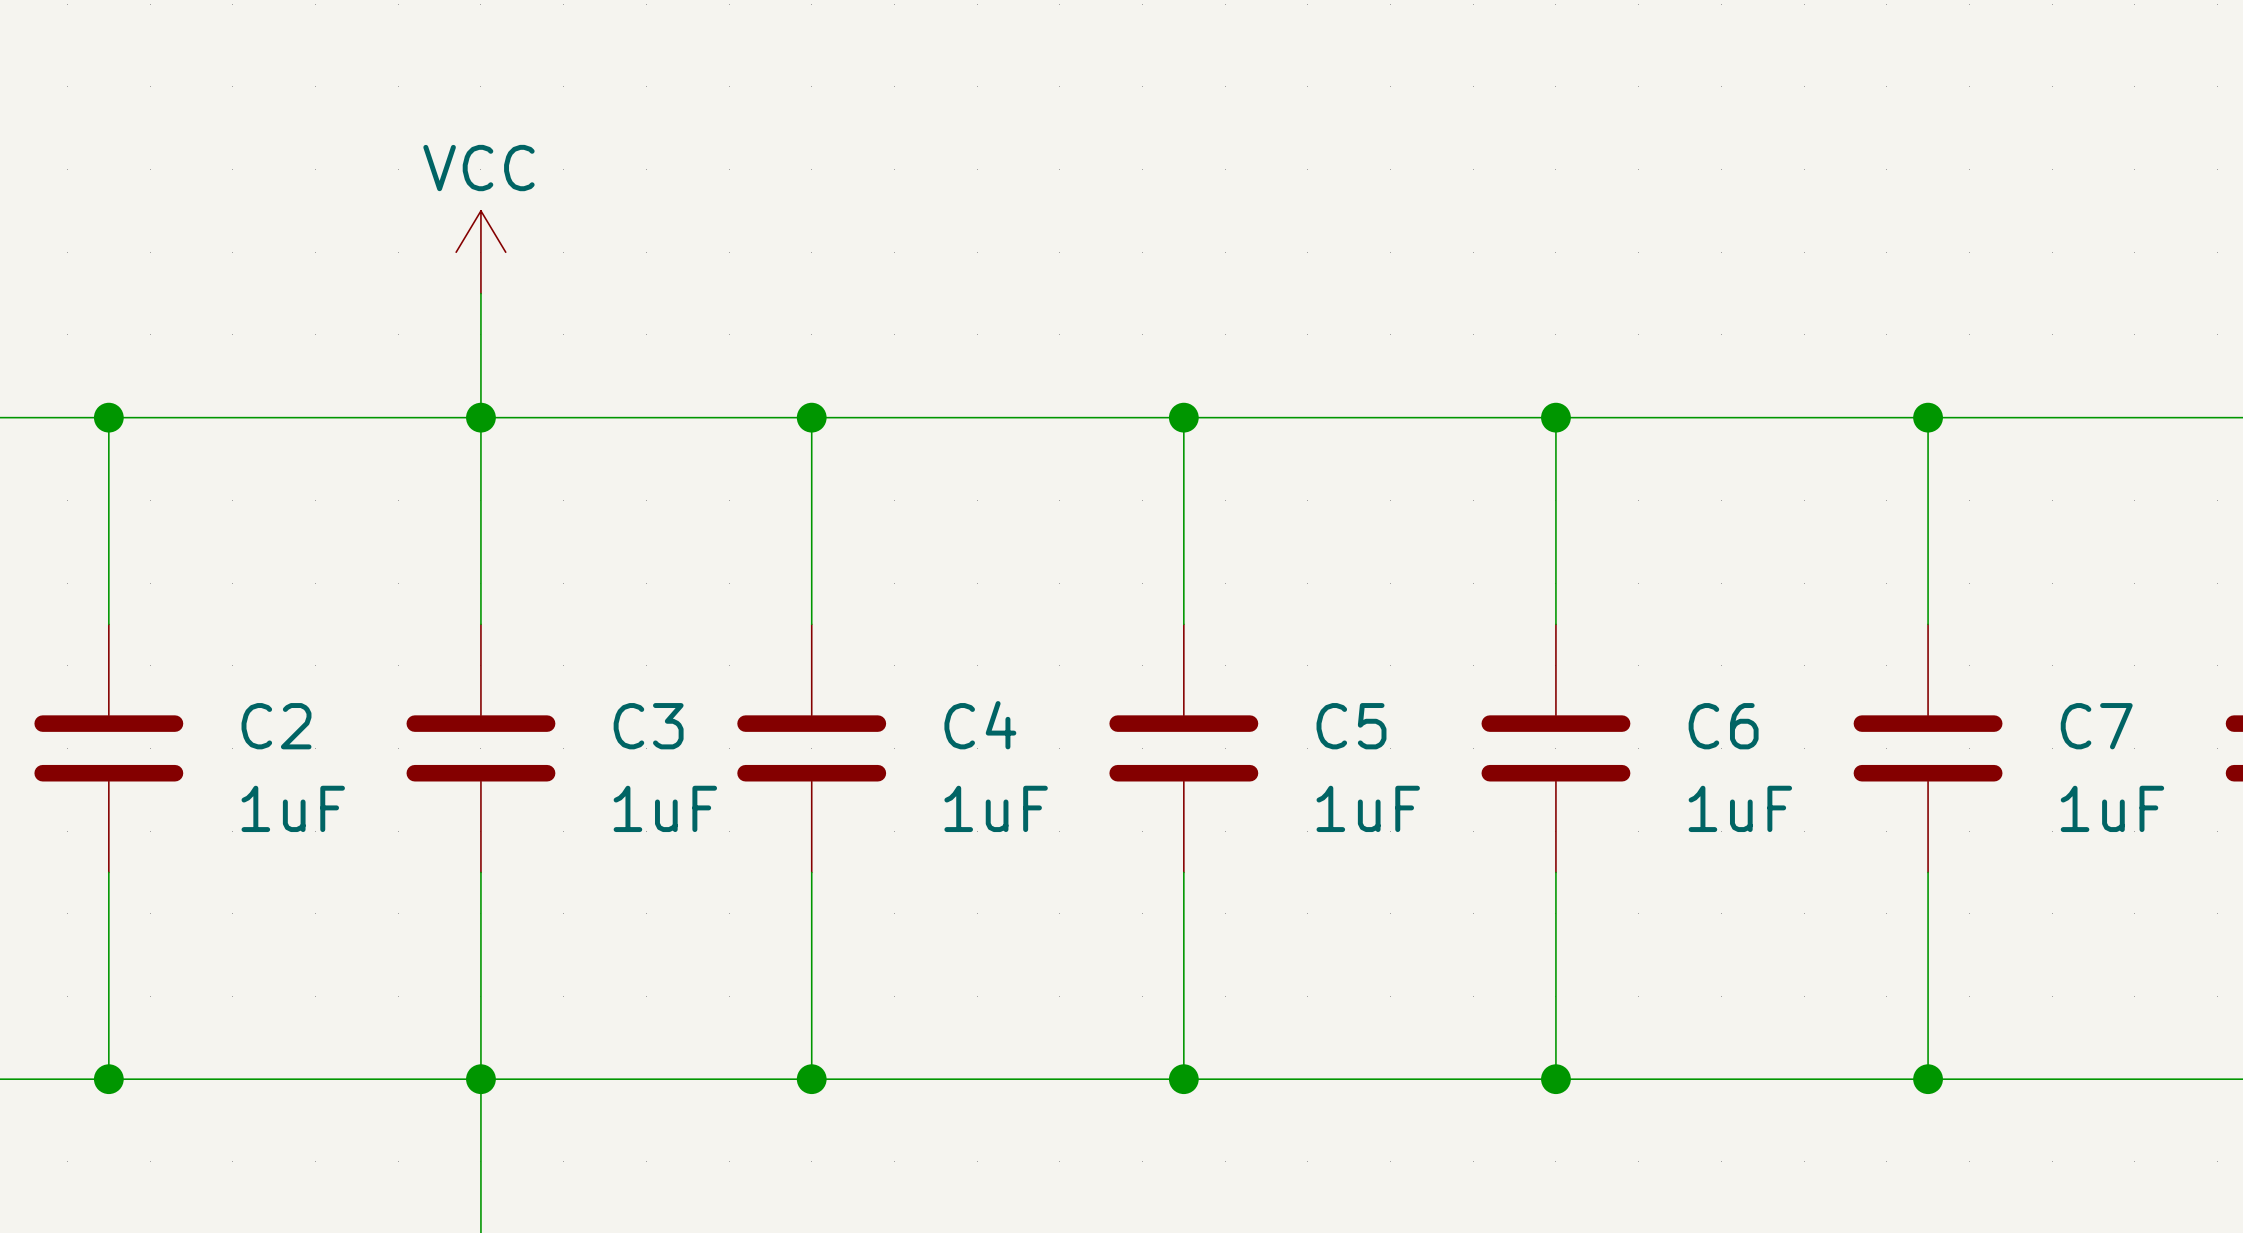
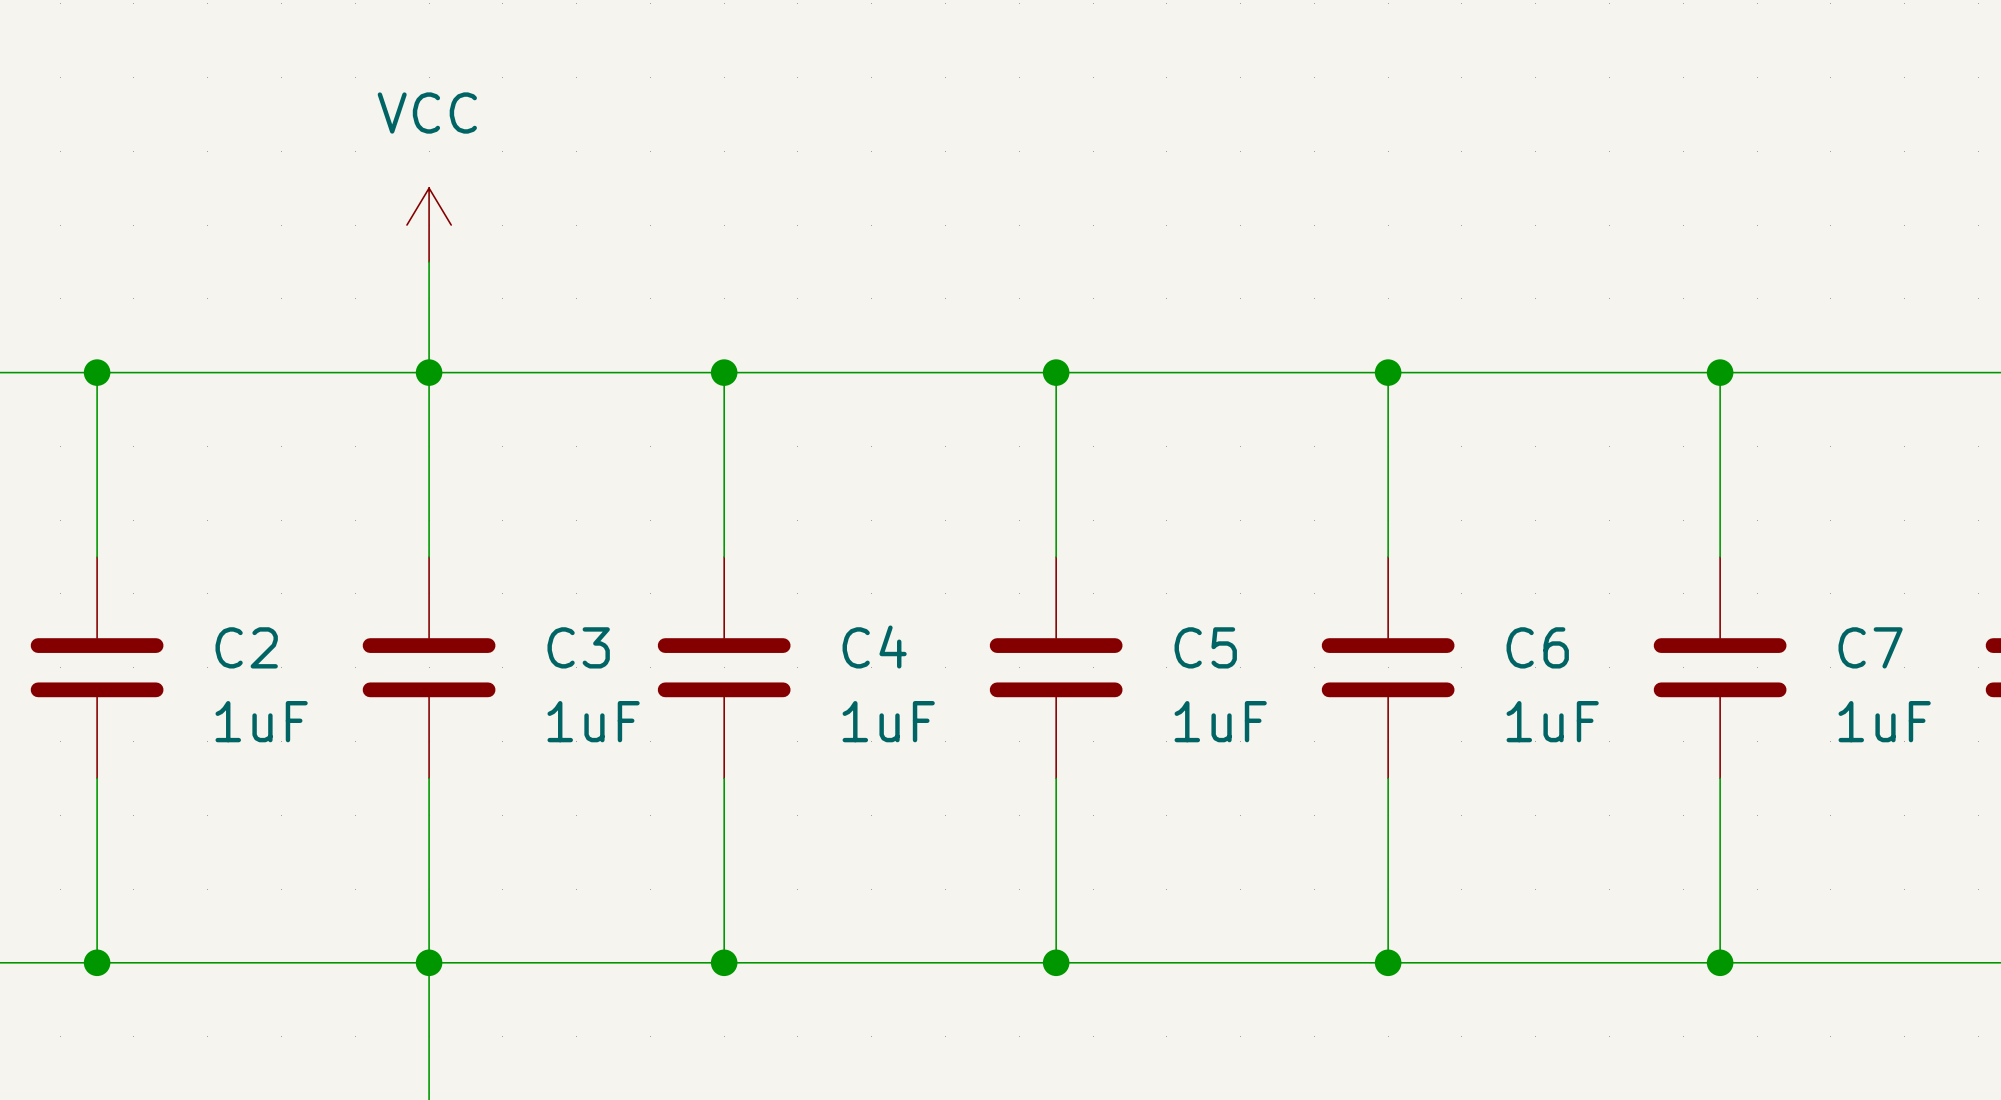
power symbol text position: VCC (478, 168) -> VCC (427, 113)

